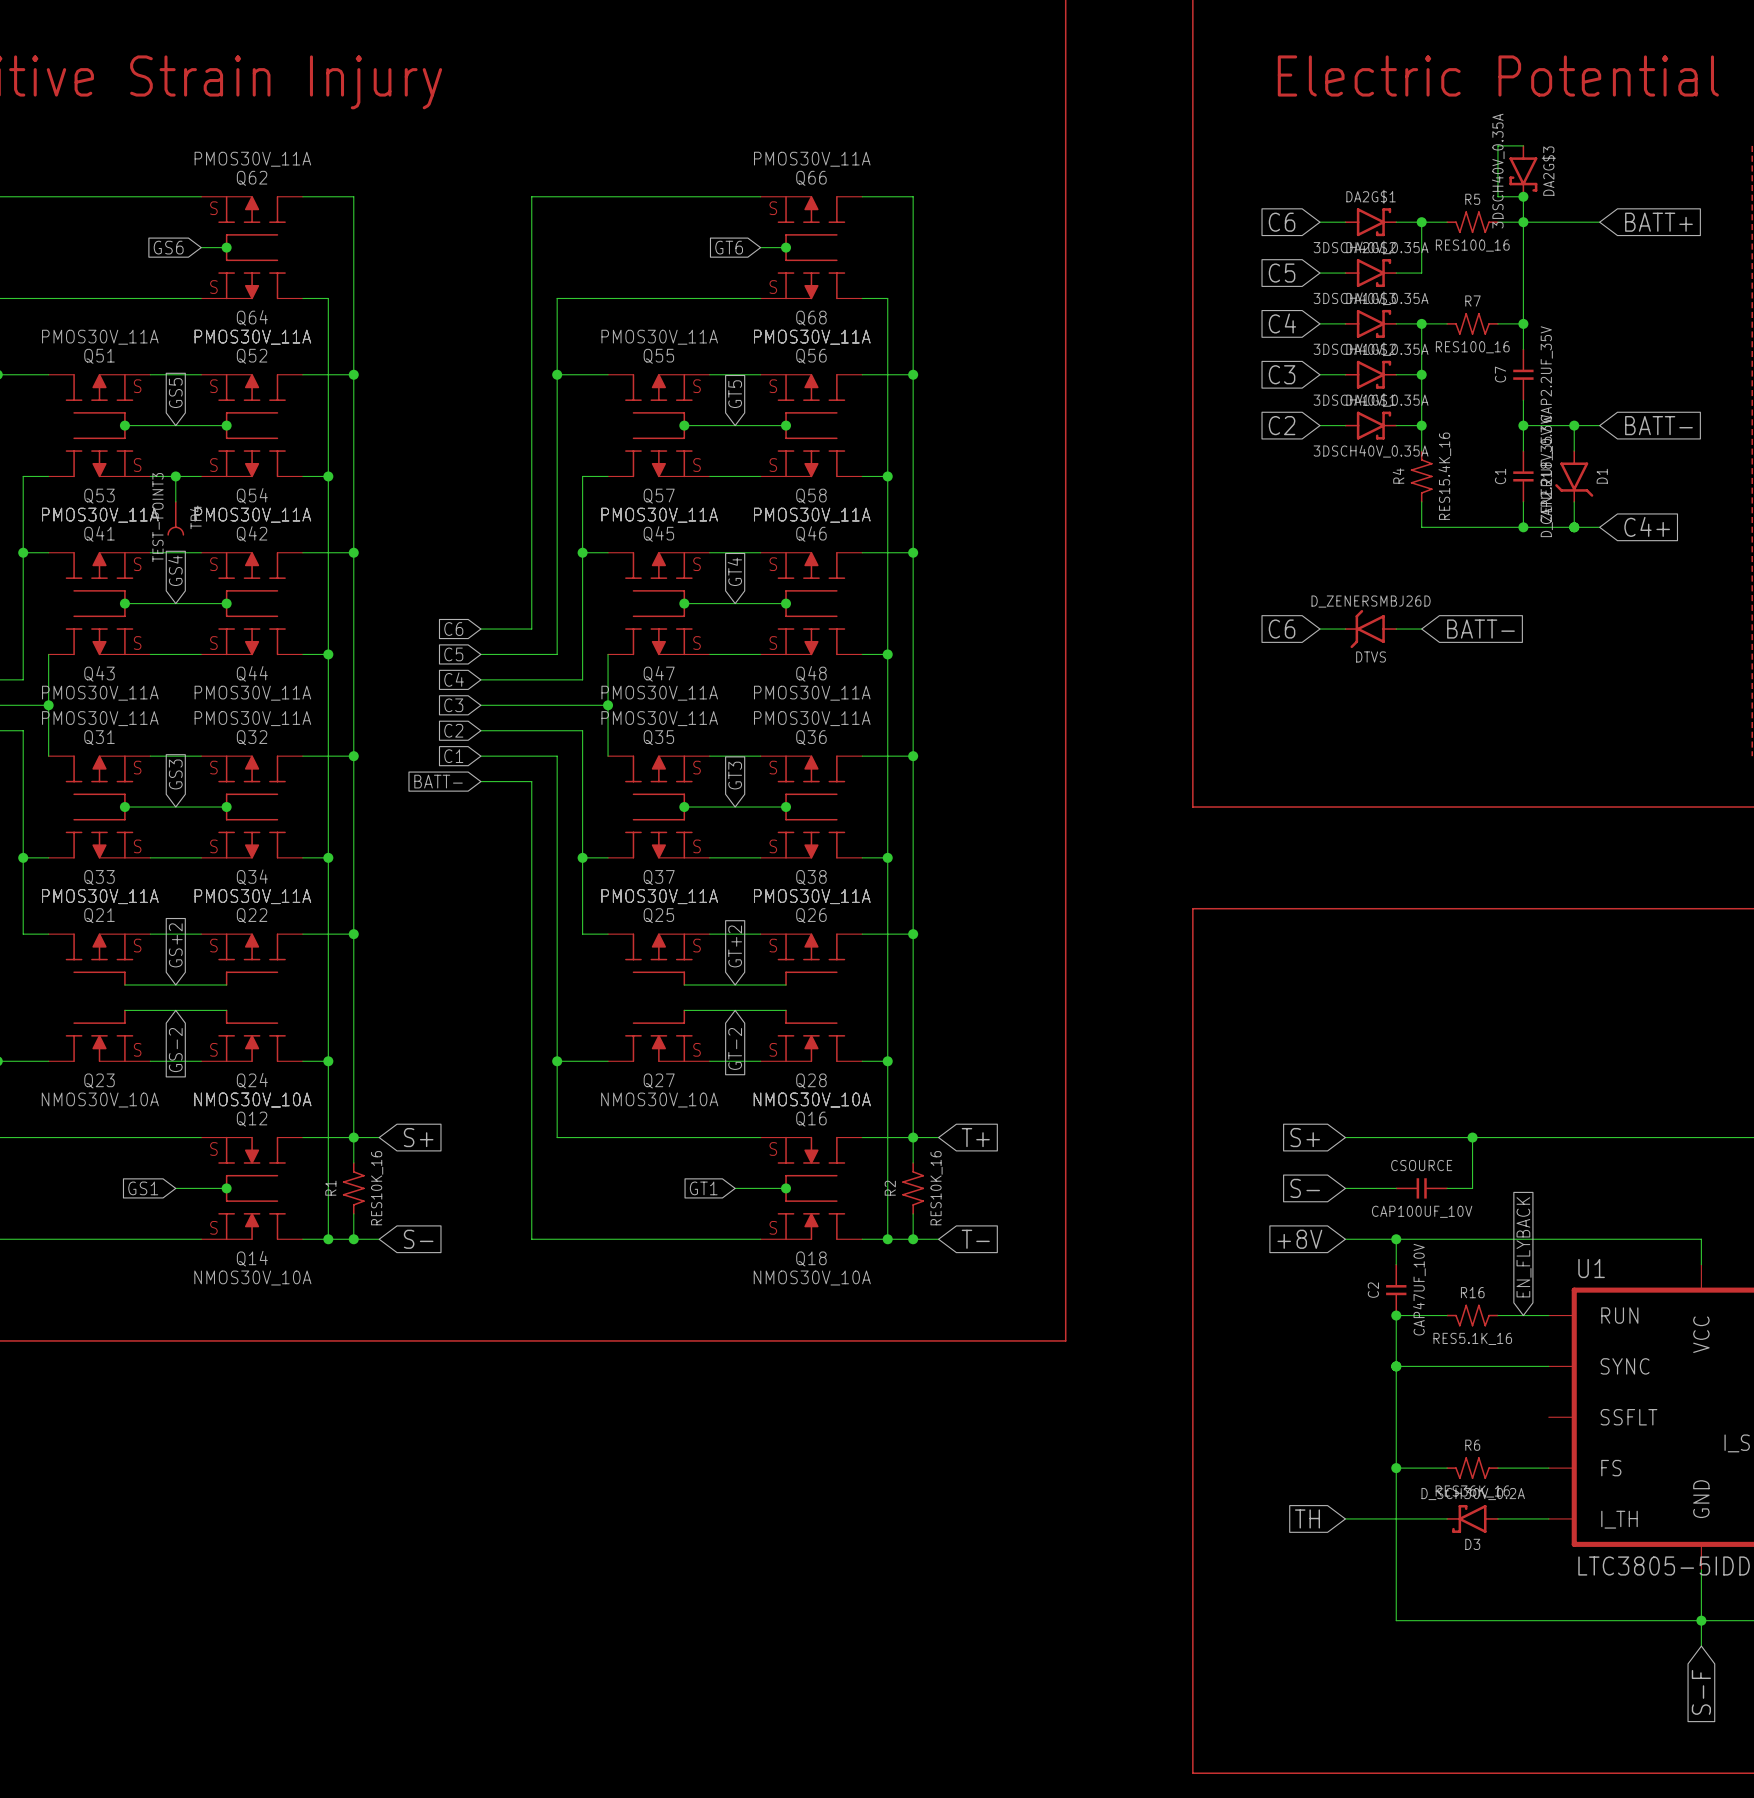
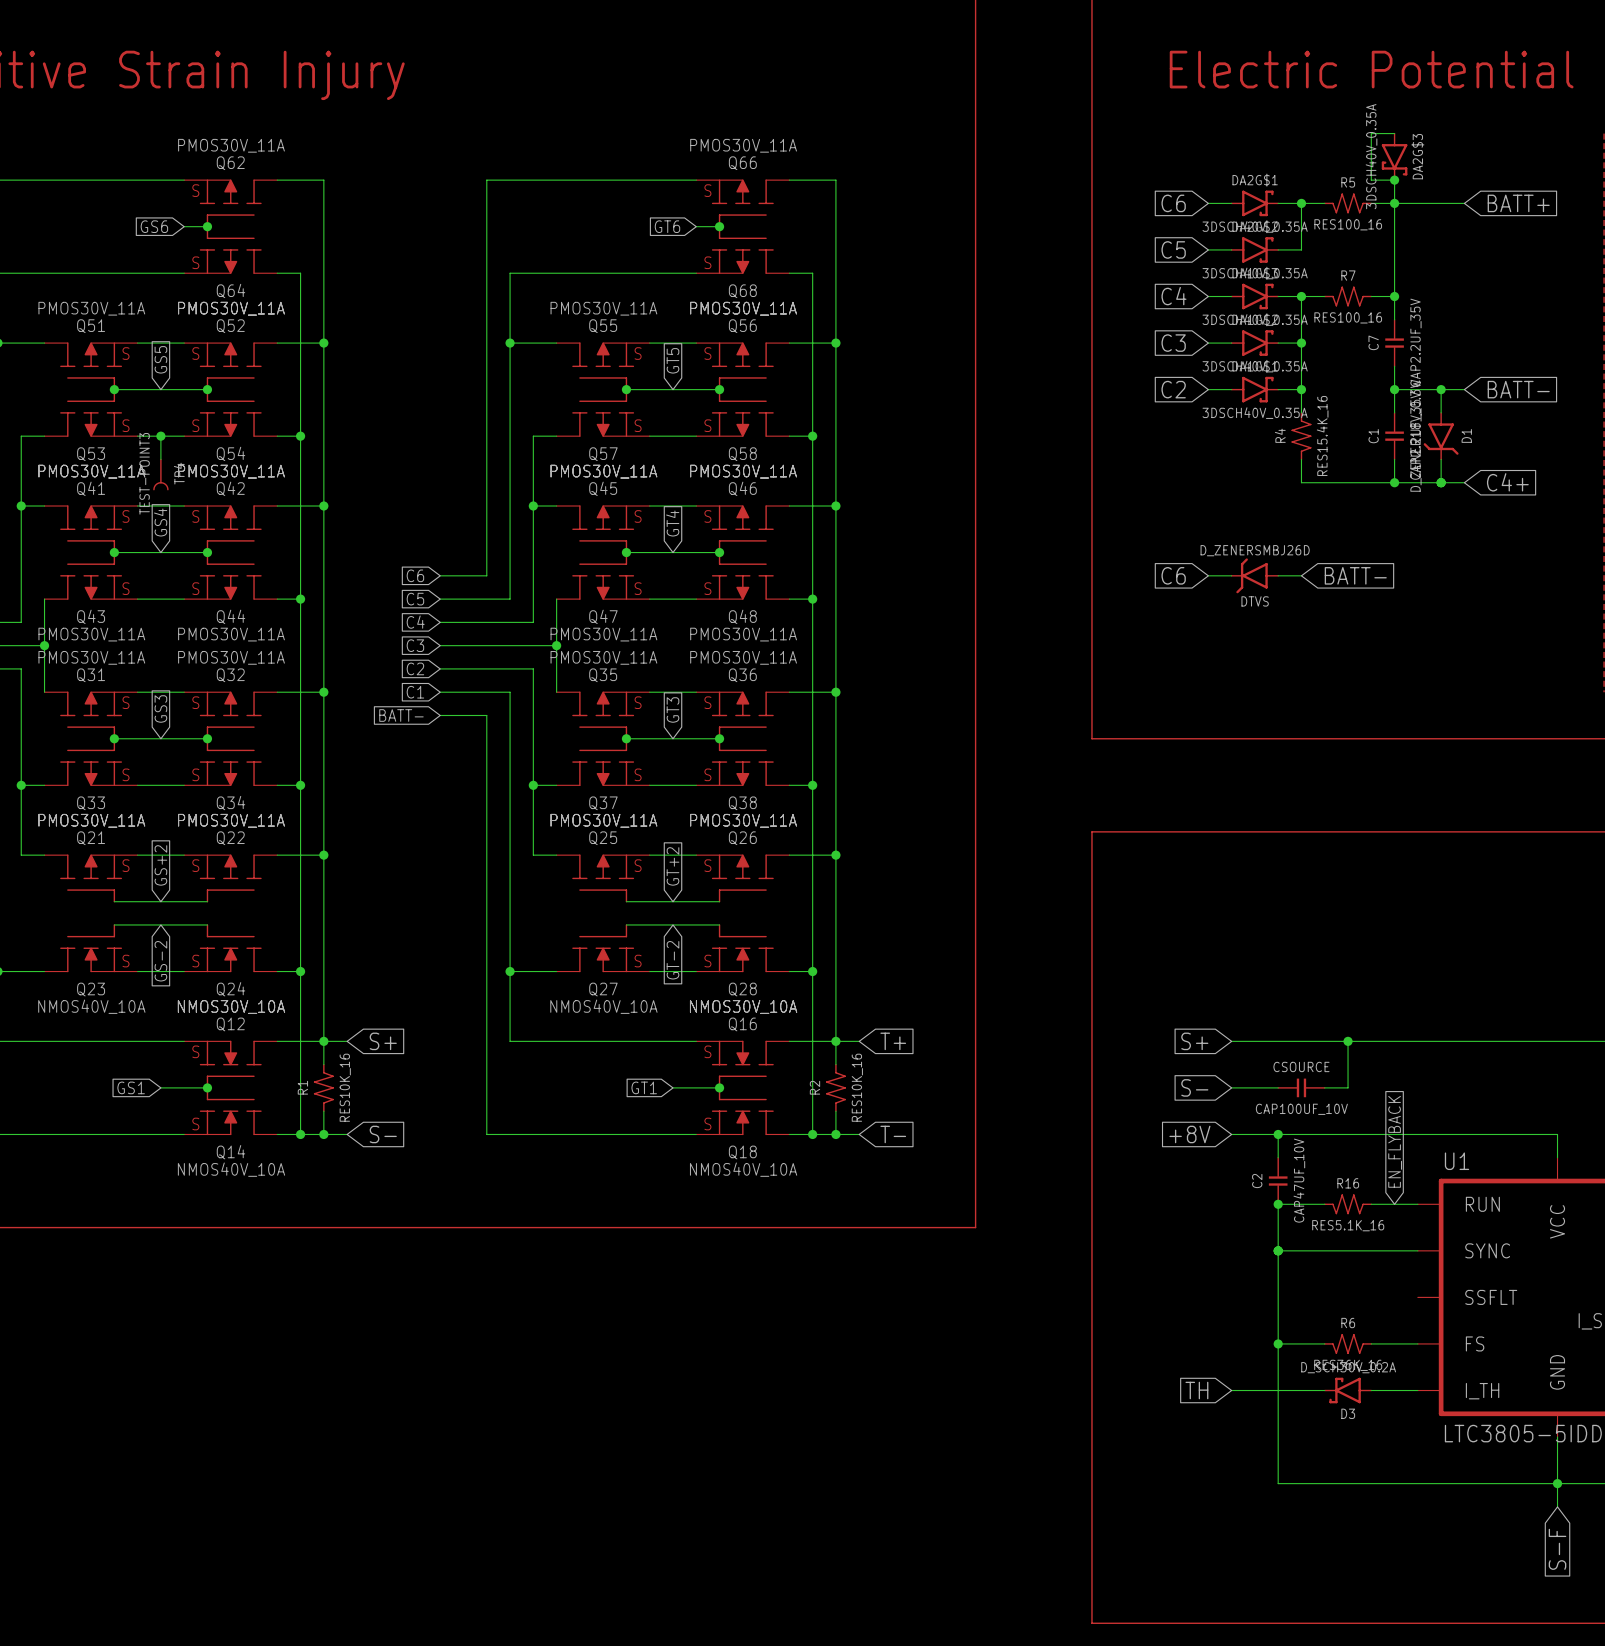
Q23 value: NMOS30V_10A (100, 1100) -> NMOS40V_10A (91, 1006)
Q27 value: NMOS30V_10A (659, 1100) -> NMOS40V_10A (603, 1006)
Q14 value: NMOS30V_10A (252, 1278) -> NMOS40V_10A (231, 1169)
Q18 value: NMOS30V_10A (812, 1278) -> NMOS40V_10A (743, 1169)

